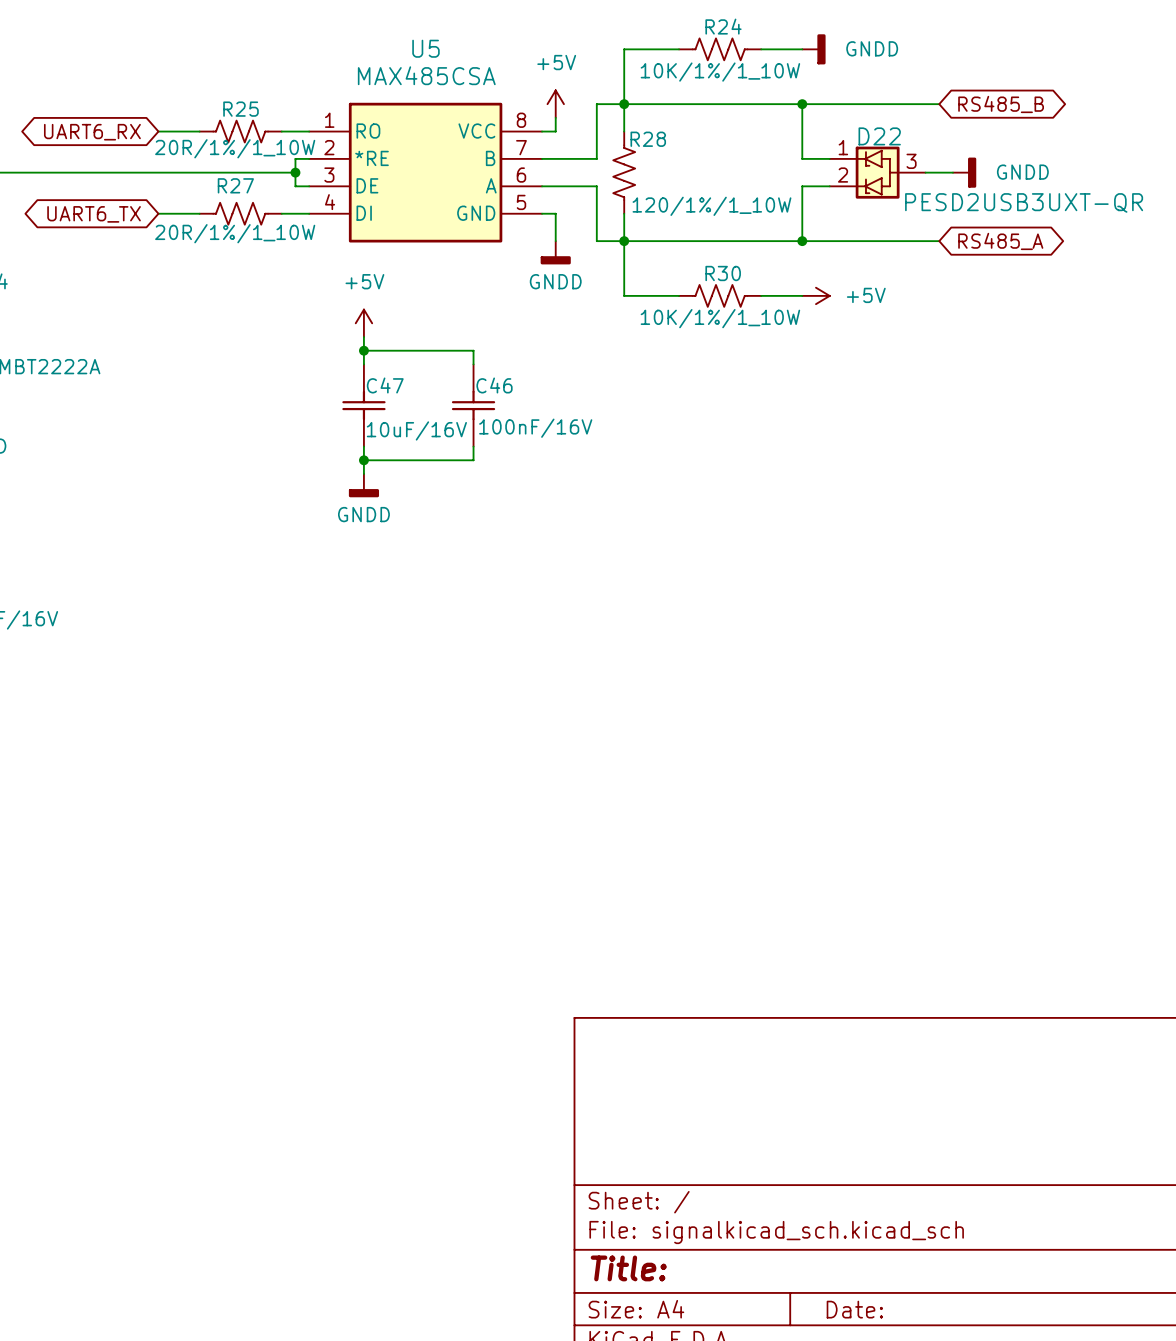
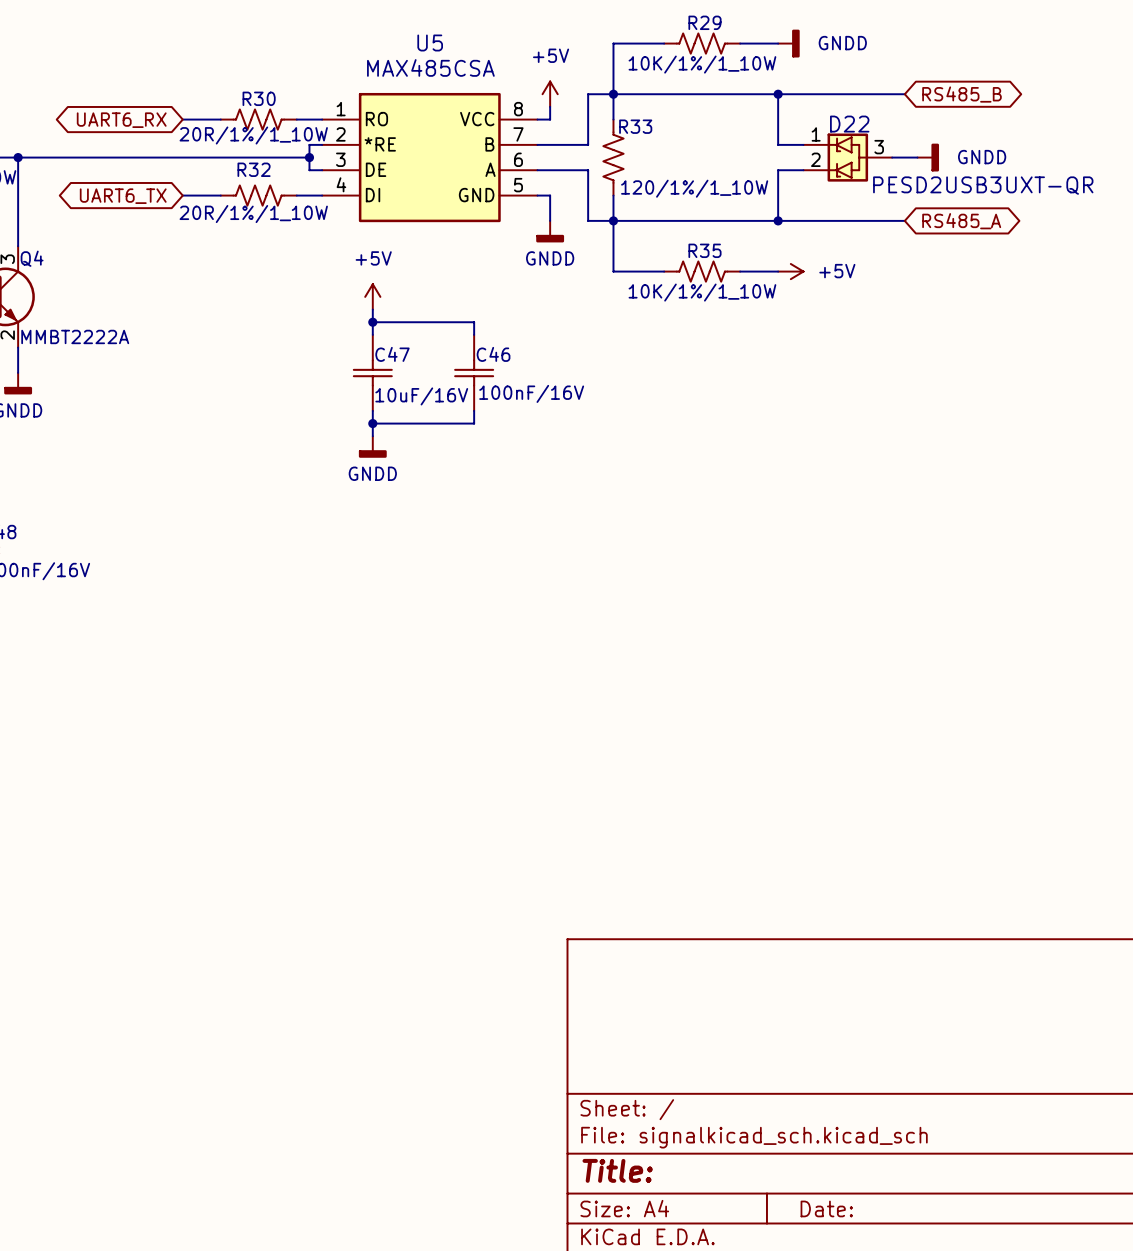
R24 name: R24 (723, 26) -> R29 (704, 22)
R25 name: R25 (240, 109) -> R30 (259, 98)
R28 name: R28 (648, 139) -> R33 (635, 126)
R27 name: R27 (235, 185) -> R32 (254, 169)
R30 name: R30 (723, 273) -> R35 (704, 250)

